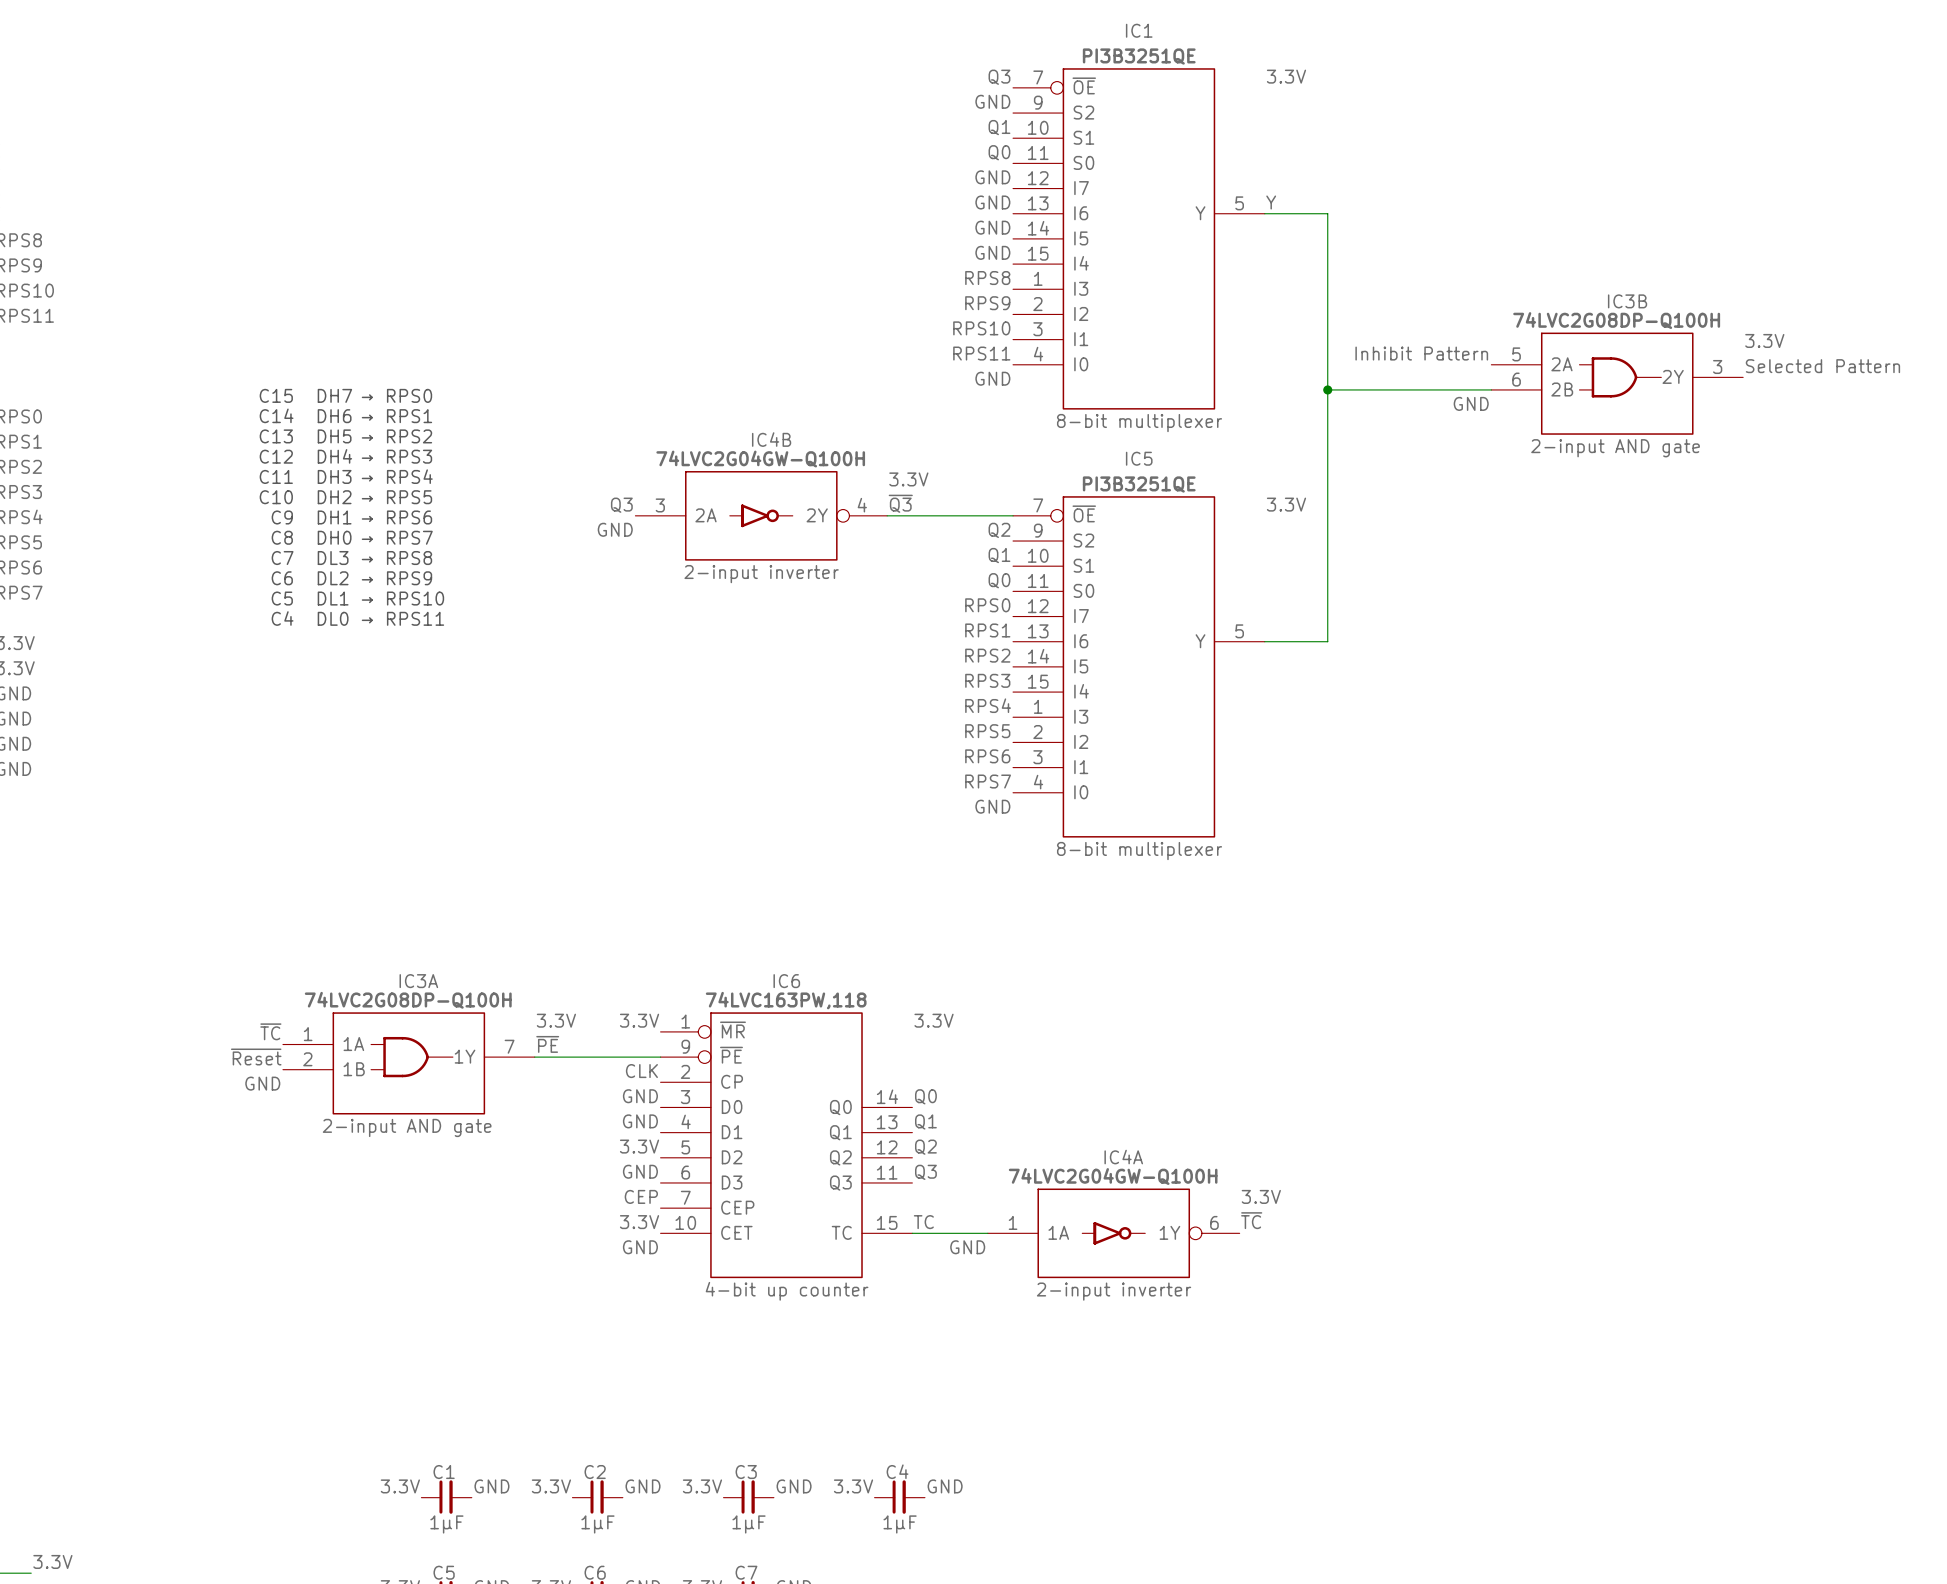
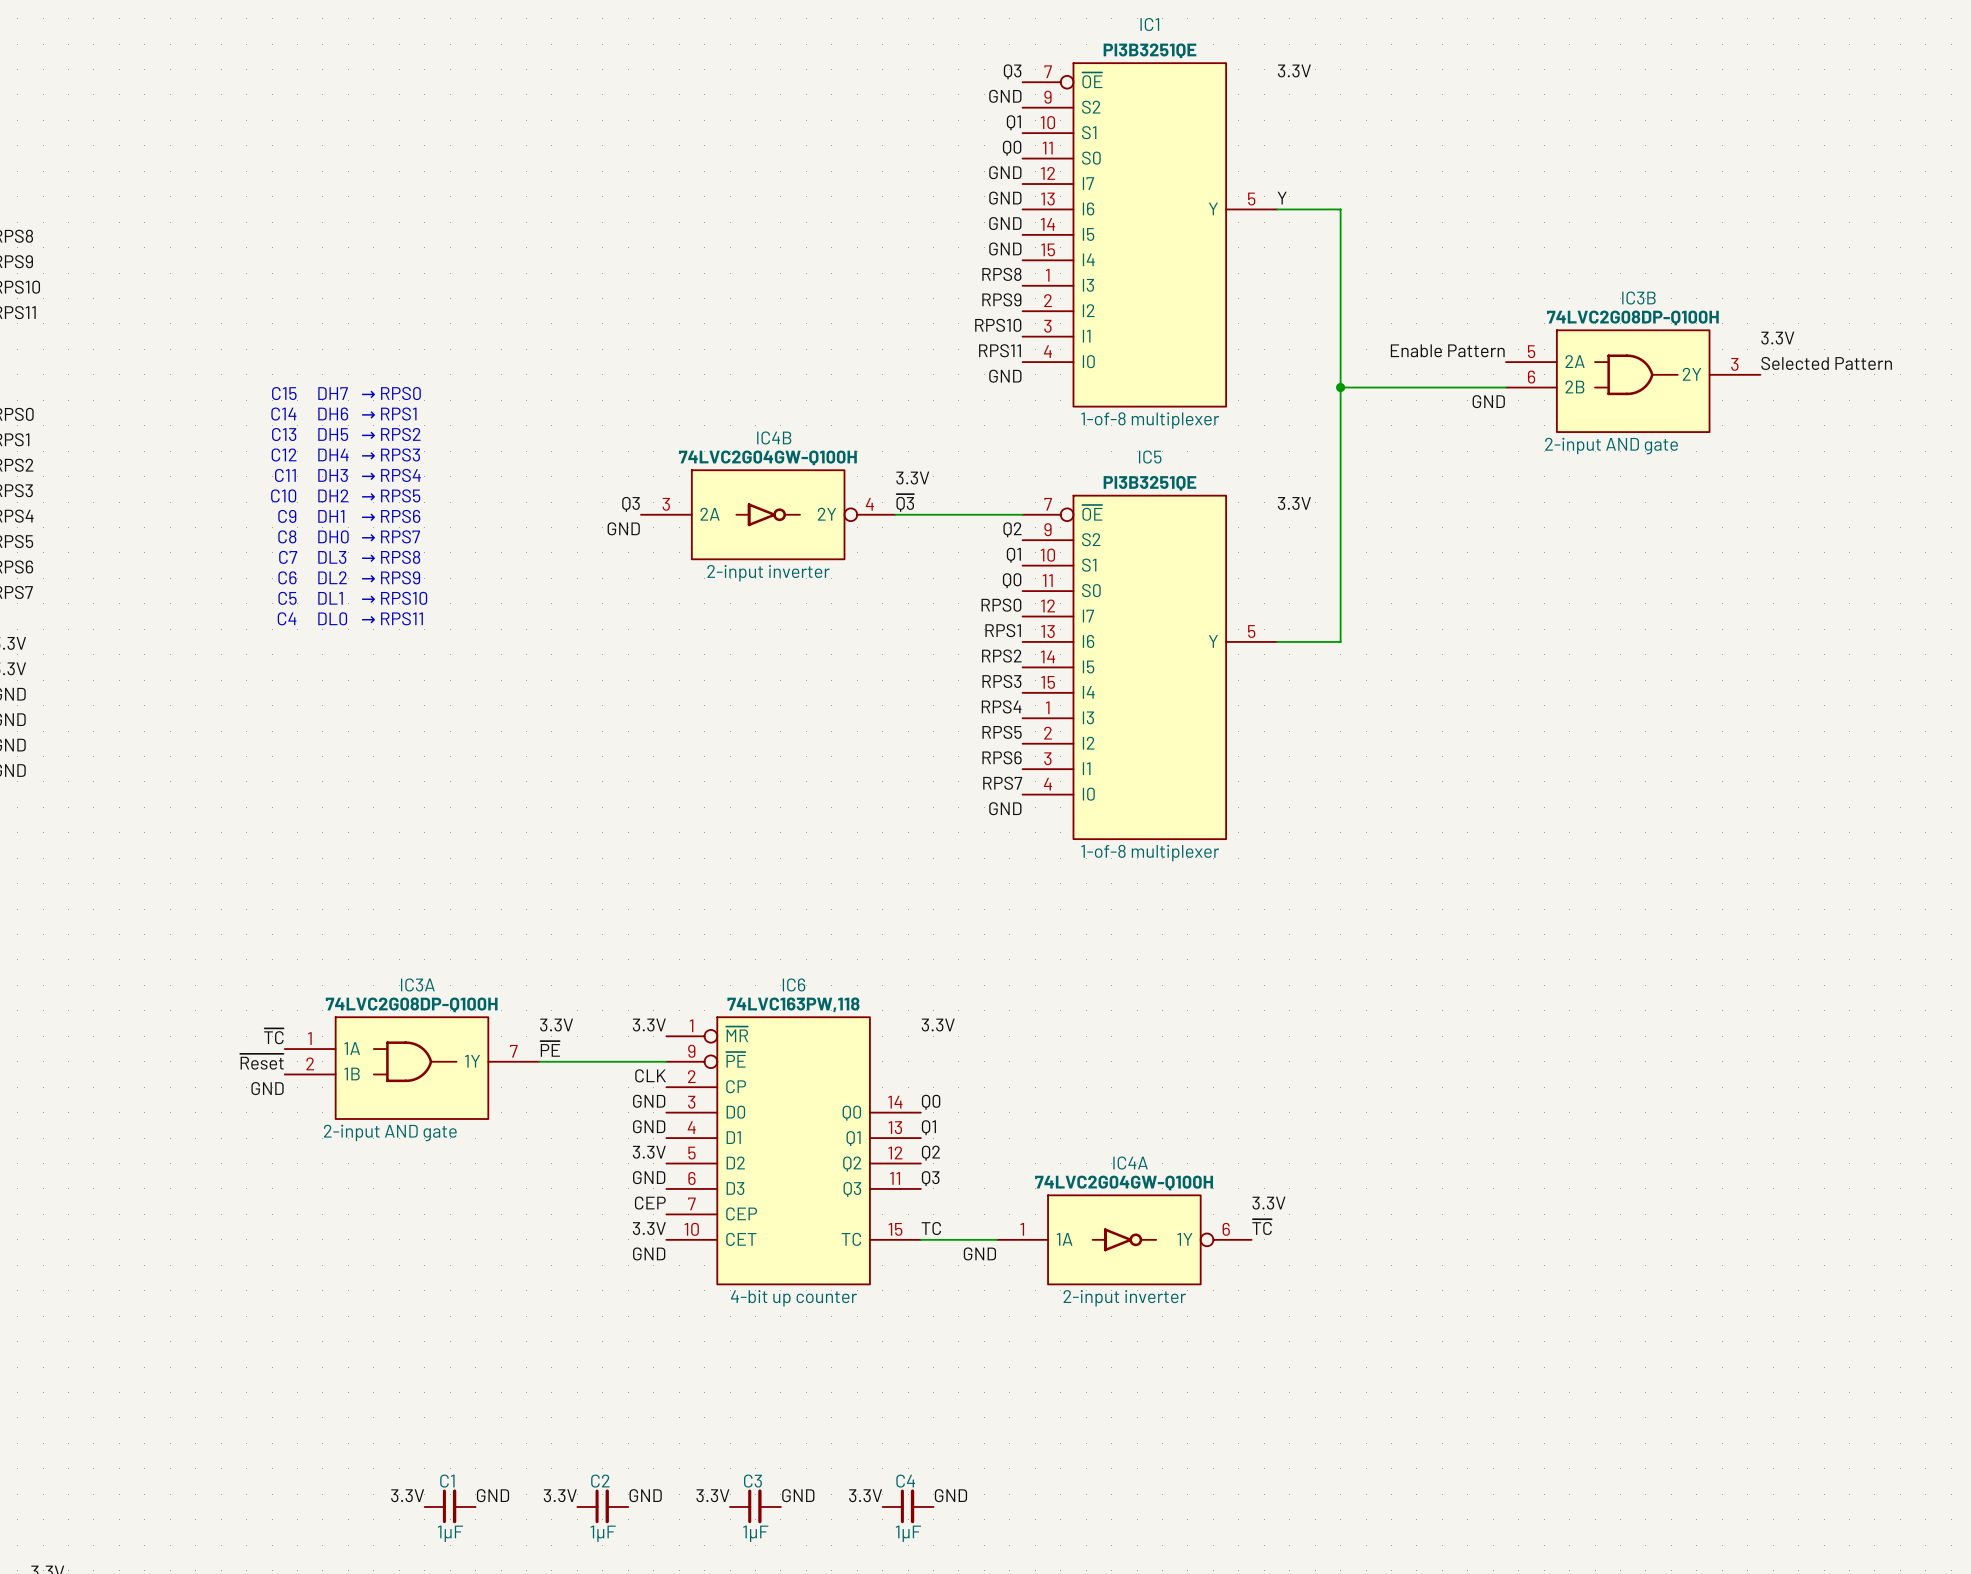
label: Inhibit Pattern (1421, 353) -> Enable Pattern (1447, 350)
IC1 text: 8-bit multiplexer (1139, 423) -> 1-of-8 multiplexer (1150, 420)
IC5 text: 8-bit multiplexer (1139, 851) -> 1-of-8 multiplexer (1150, 853)

